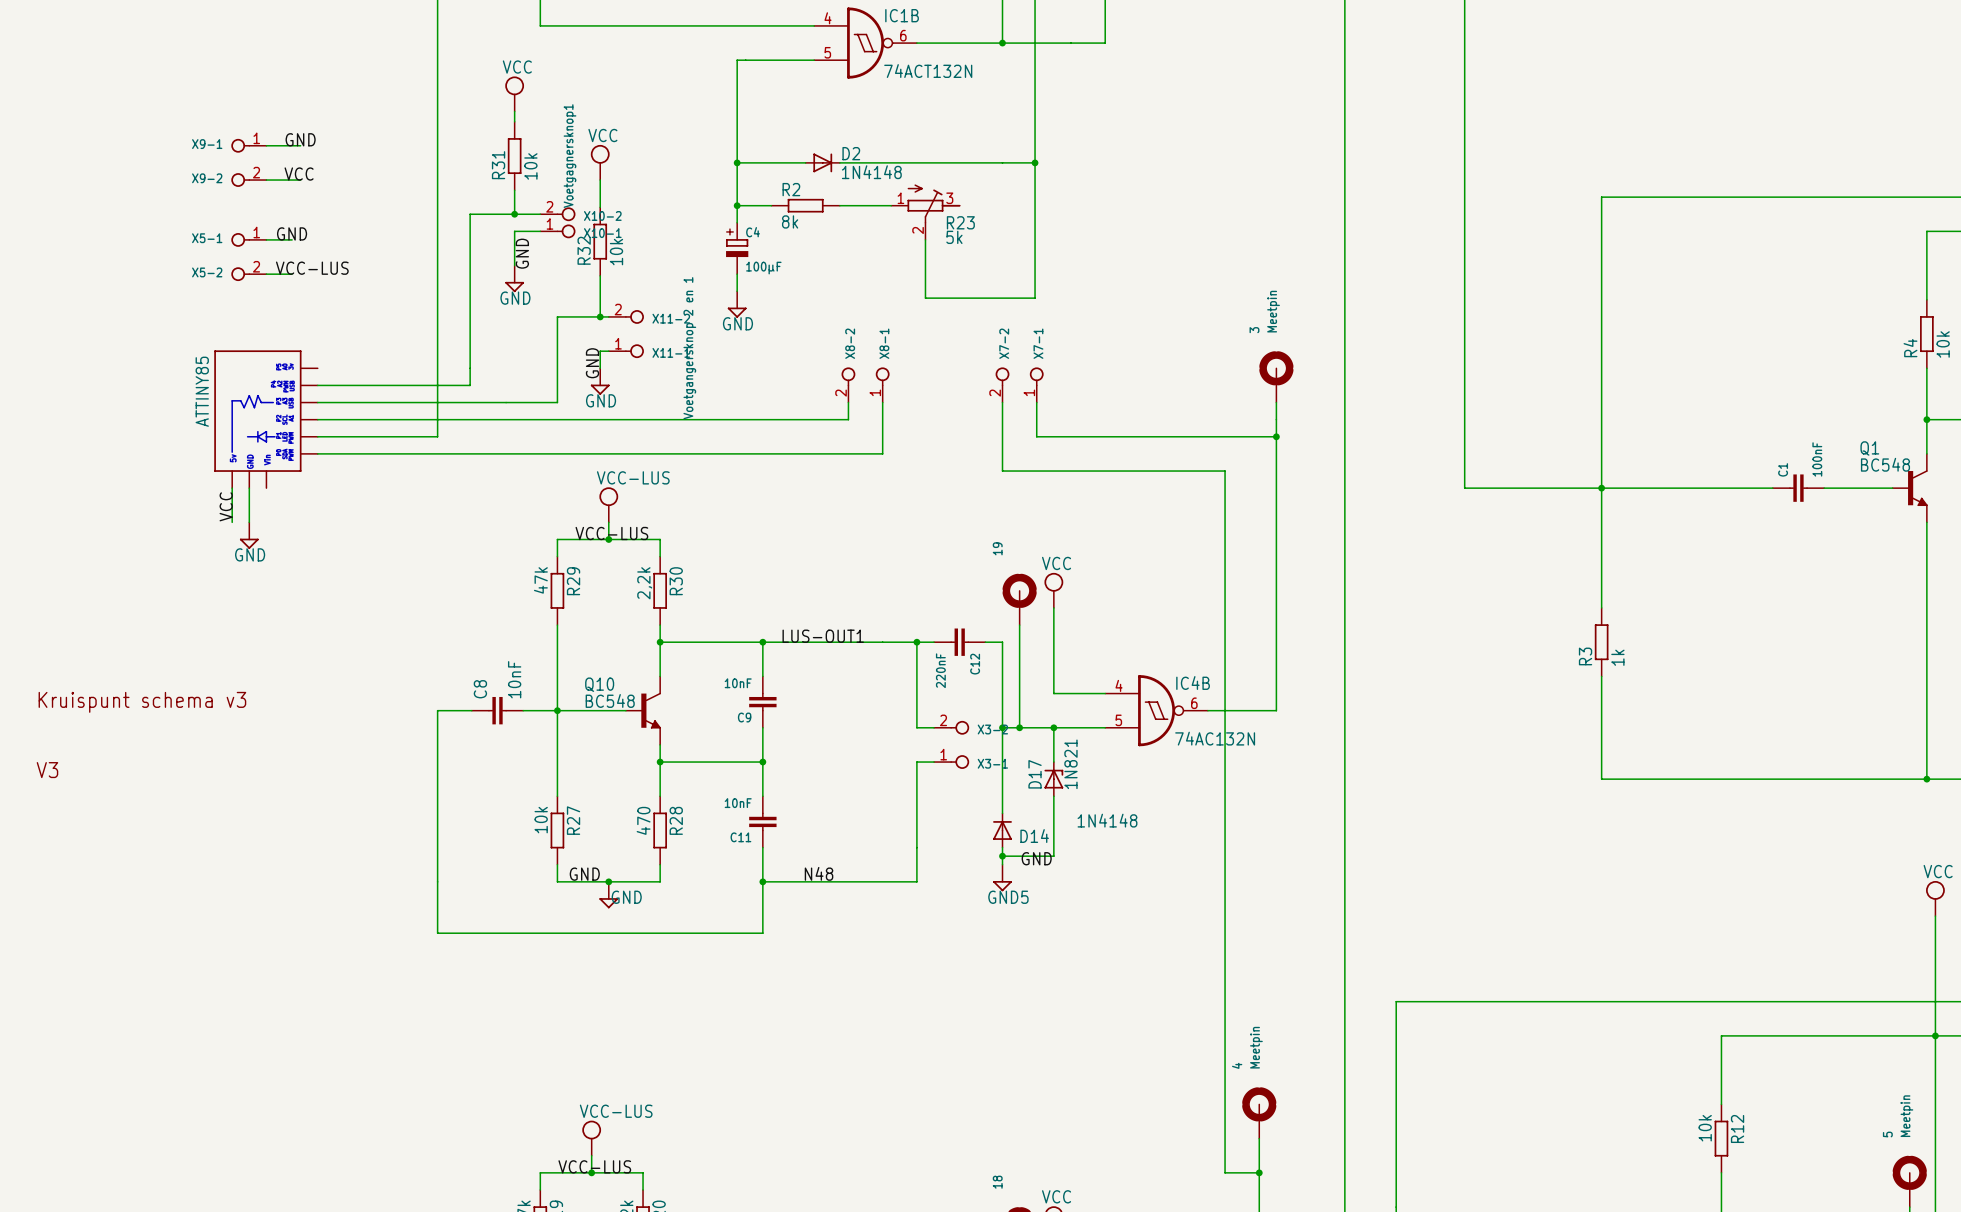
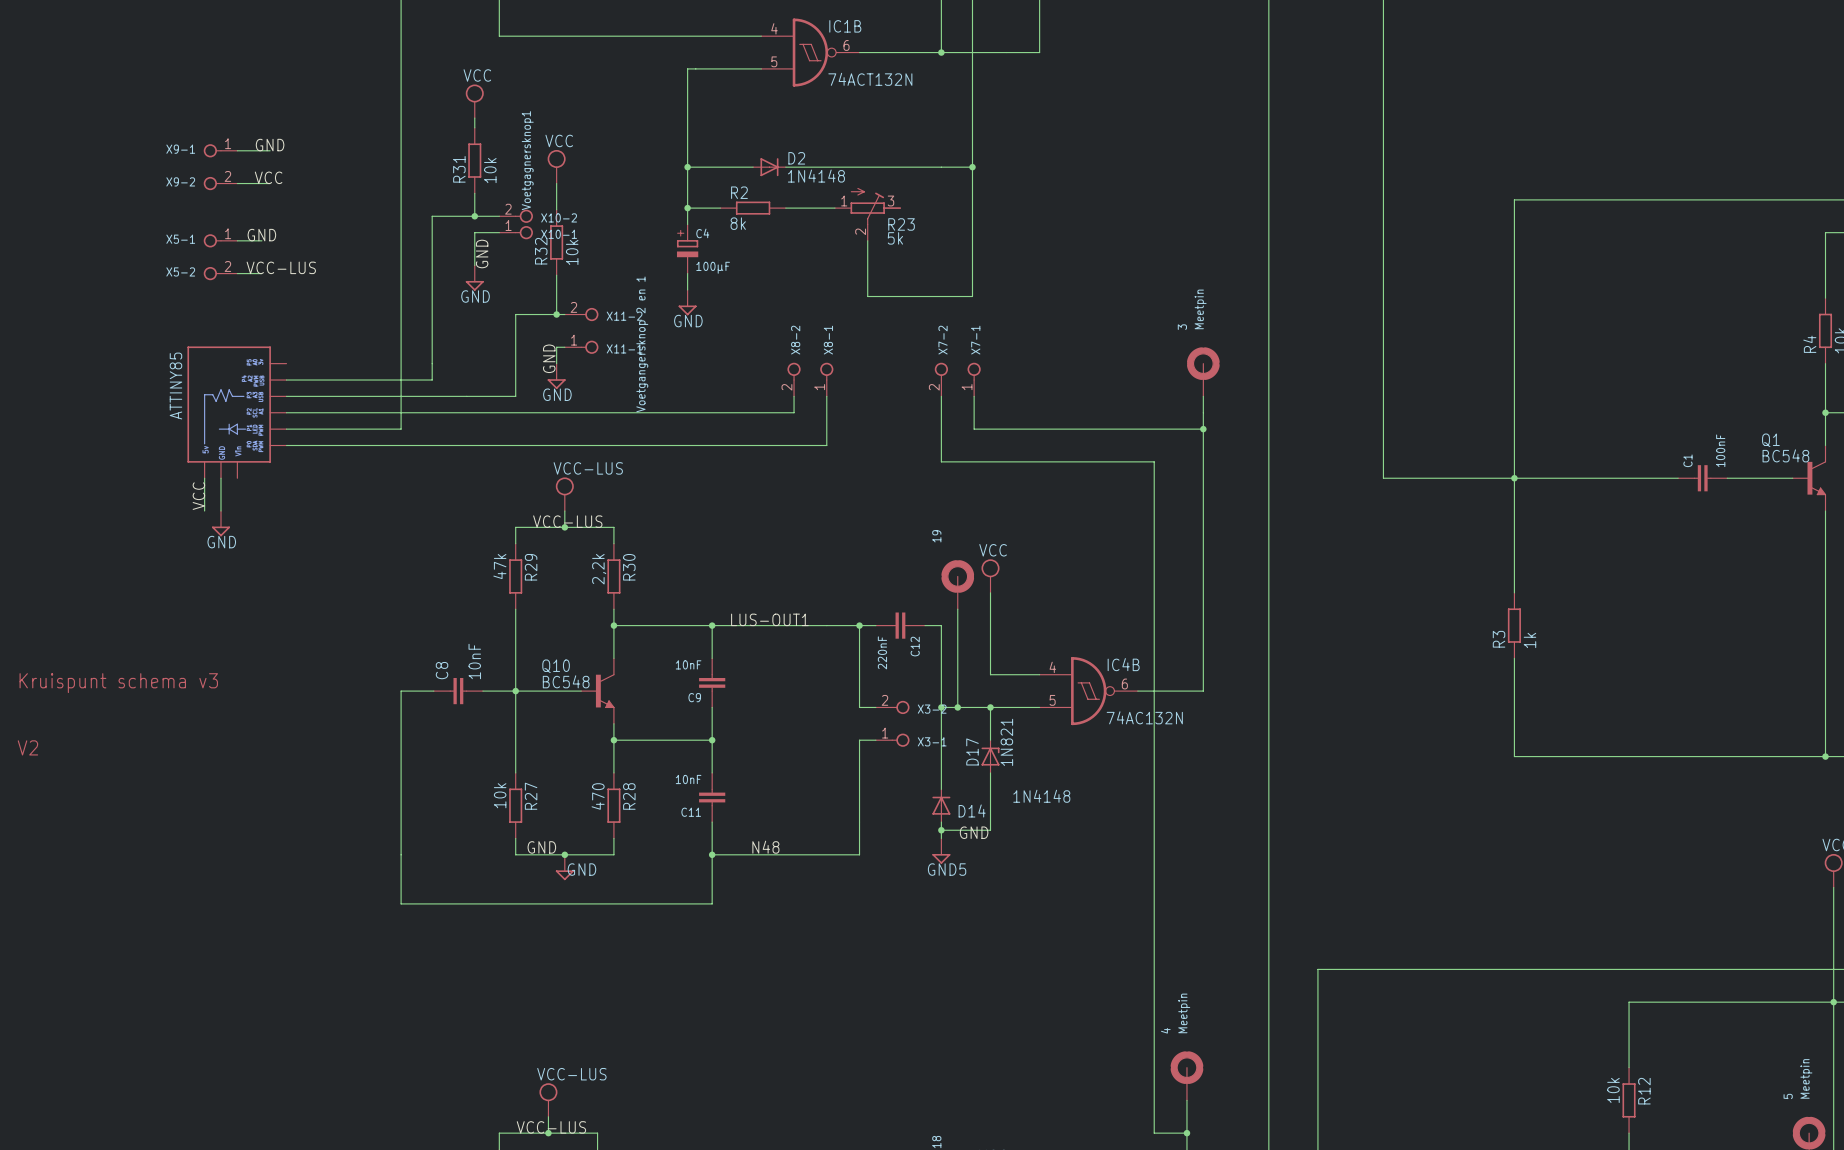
text: V3 (47, 770) -> V2 (27, 747)

